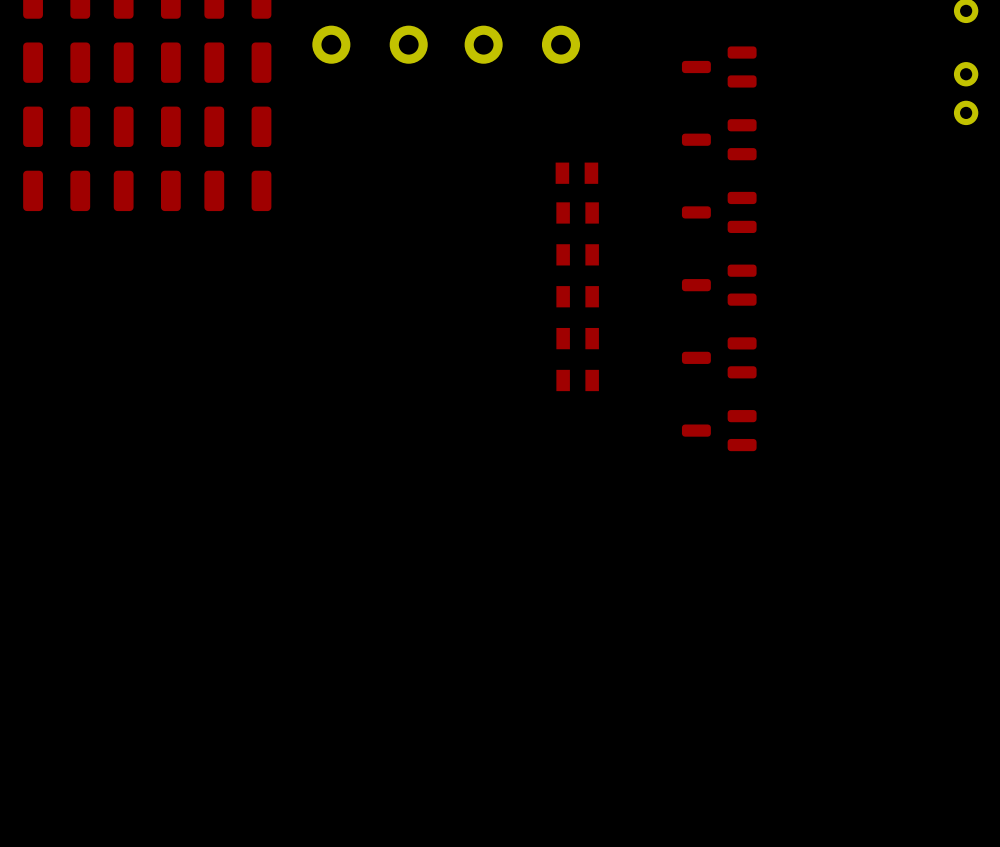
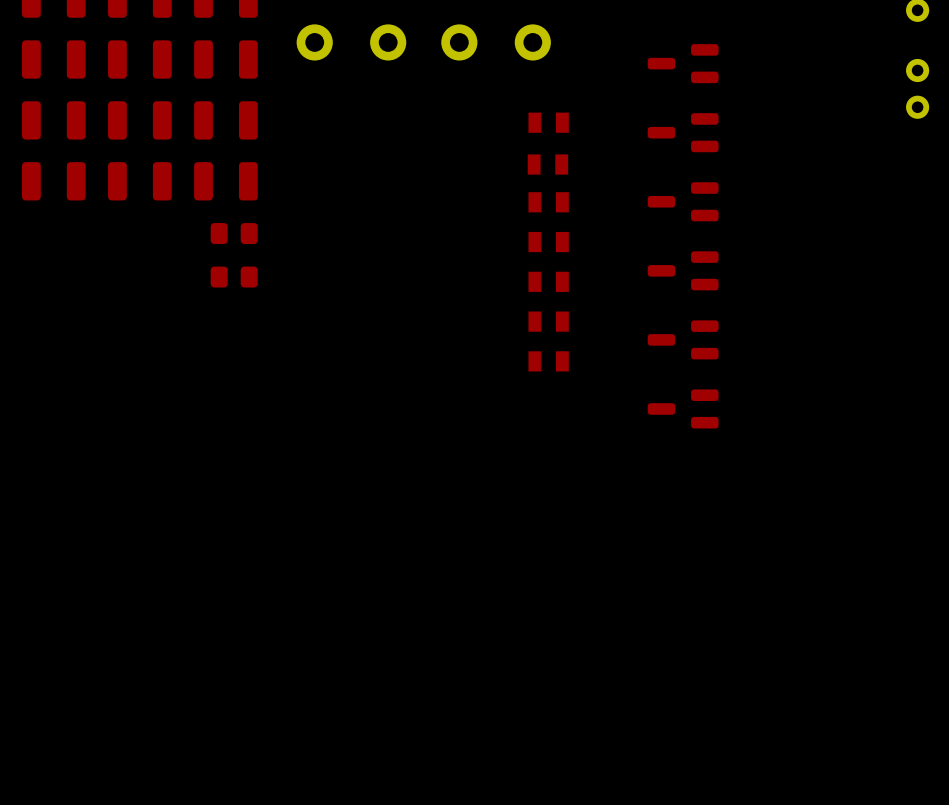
part: none -> (548, 122)
part: none -> (234, 233)
part: none -> (234, 277)

